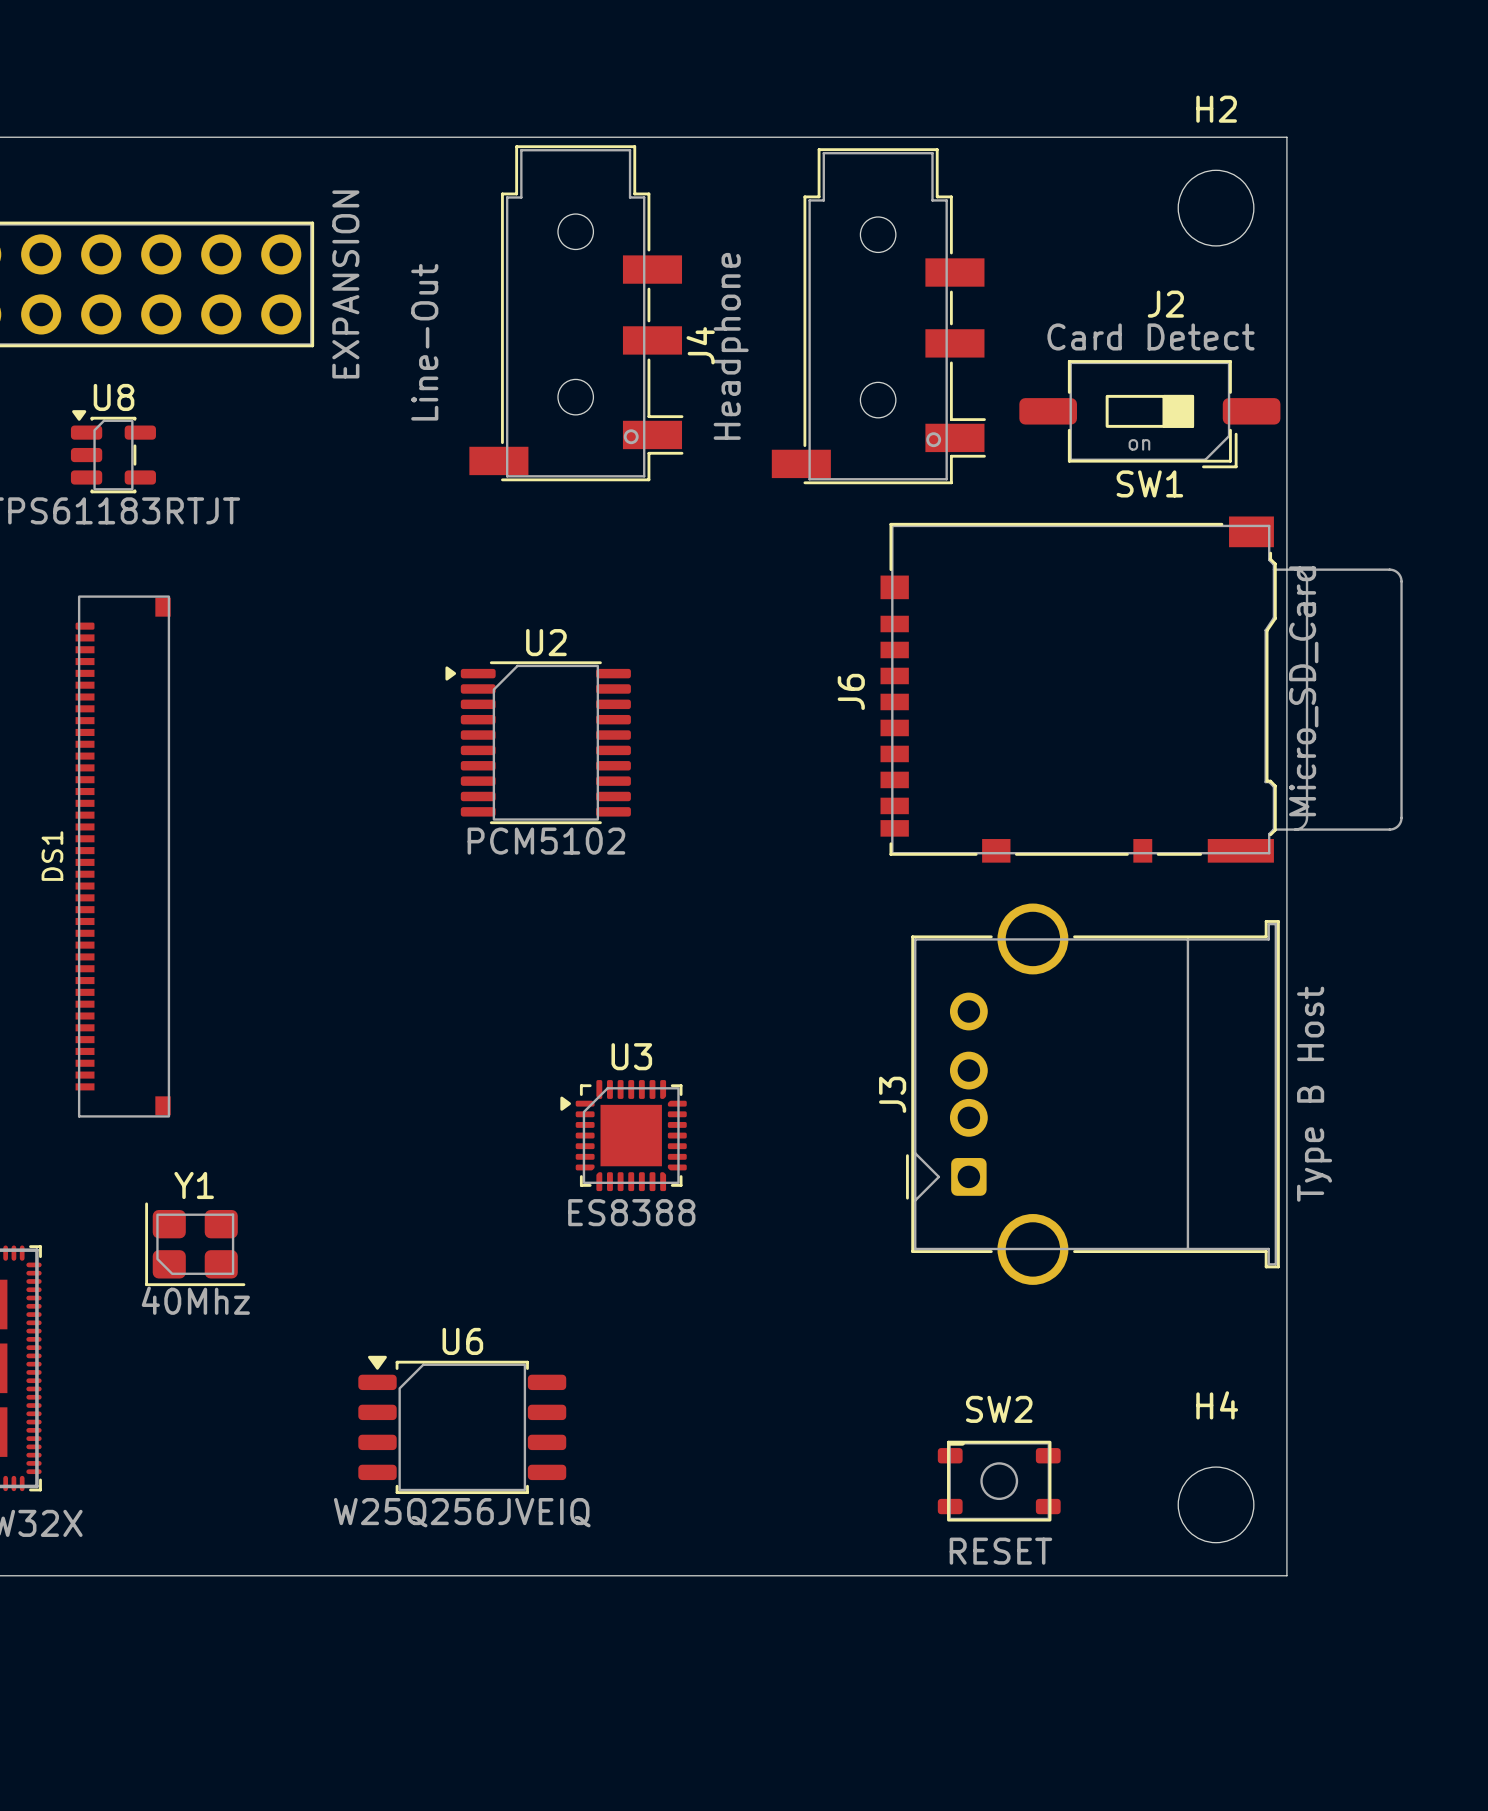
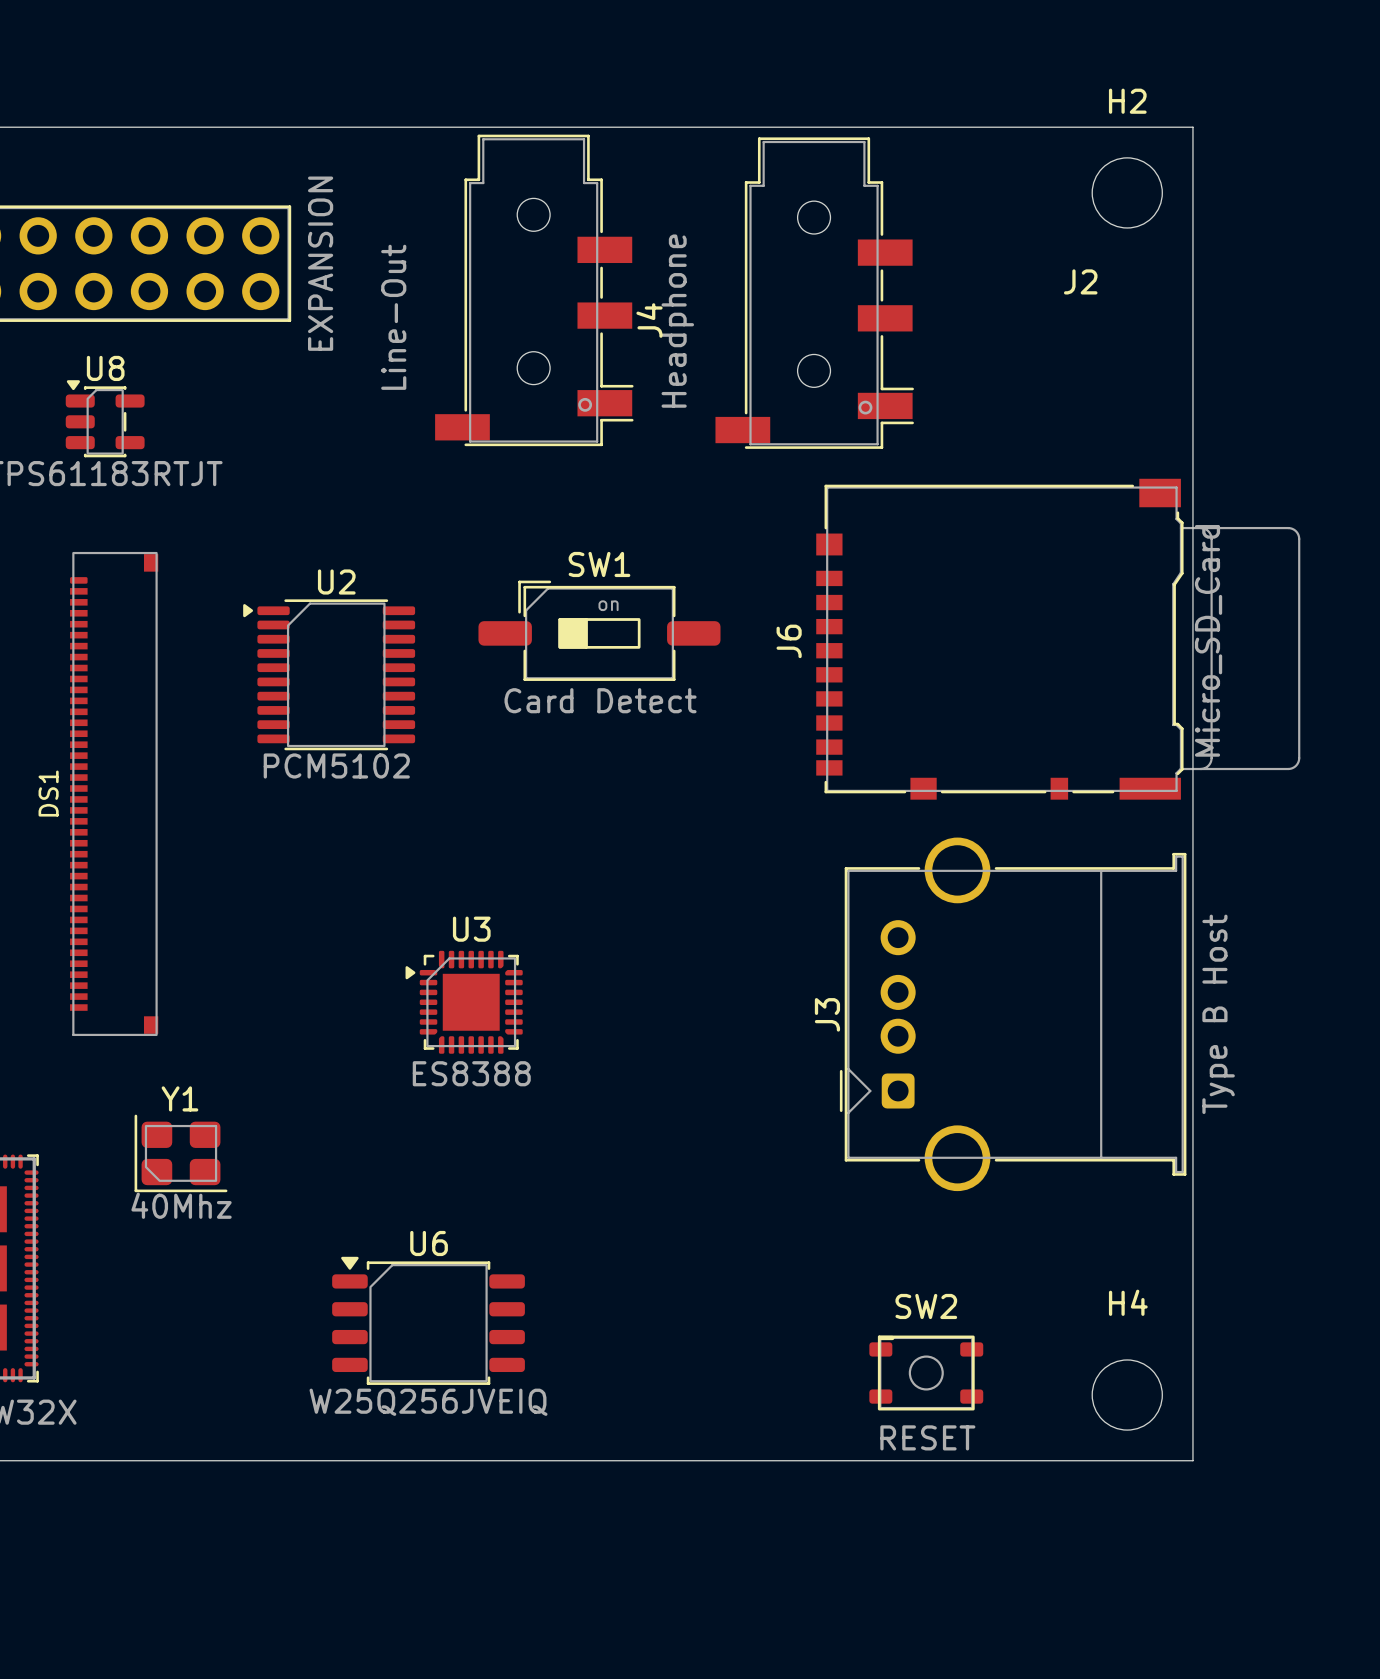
SW1 rotation: 0° (1149, 414) -> 180° (599, 630)
SW1 position: (1149, 414) -> (599, 630)
U2 position: (538, 742) -> (329, 674)
U3 position: (623, 1135) -> (464, 1002)

